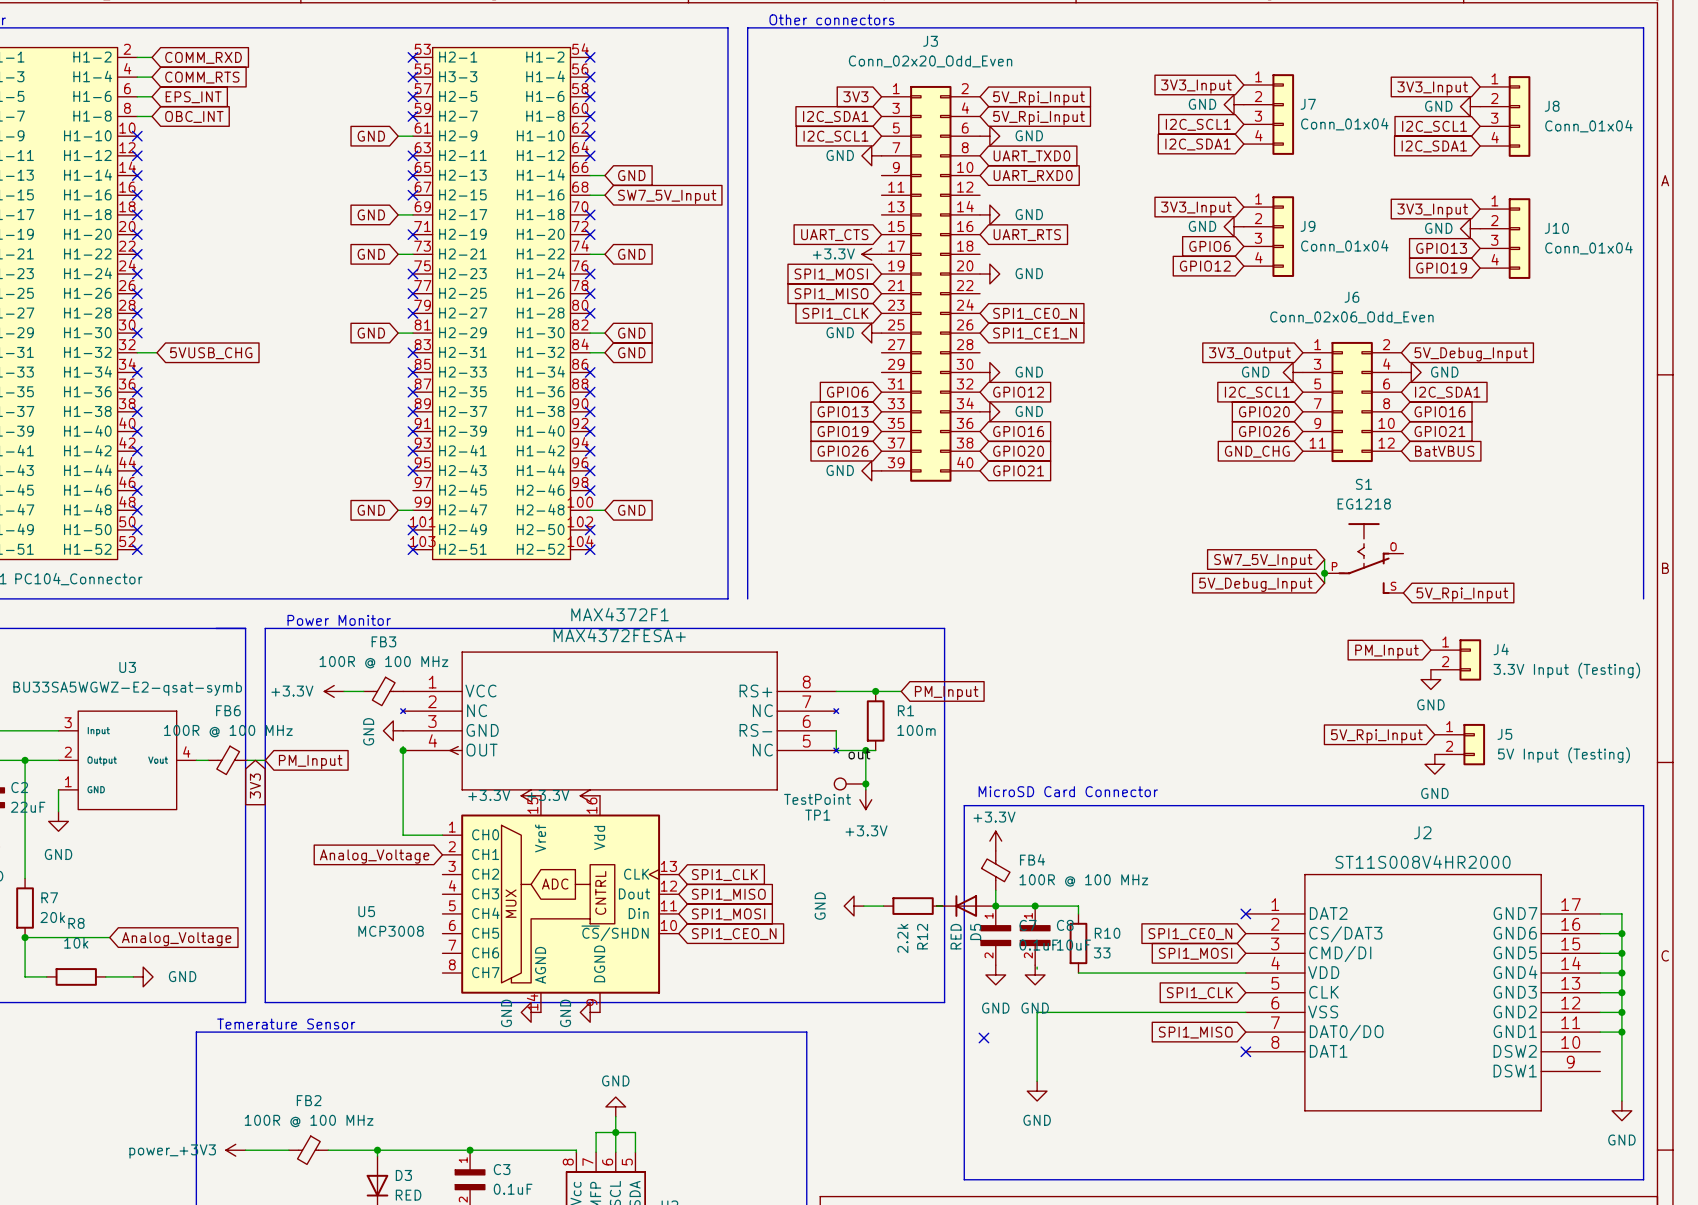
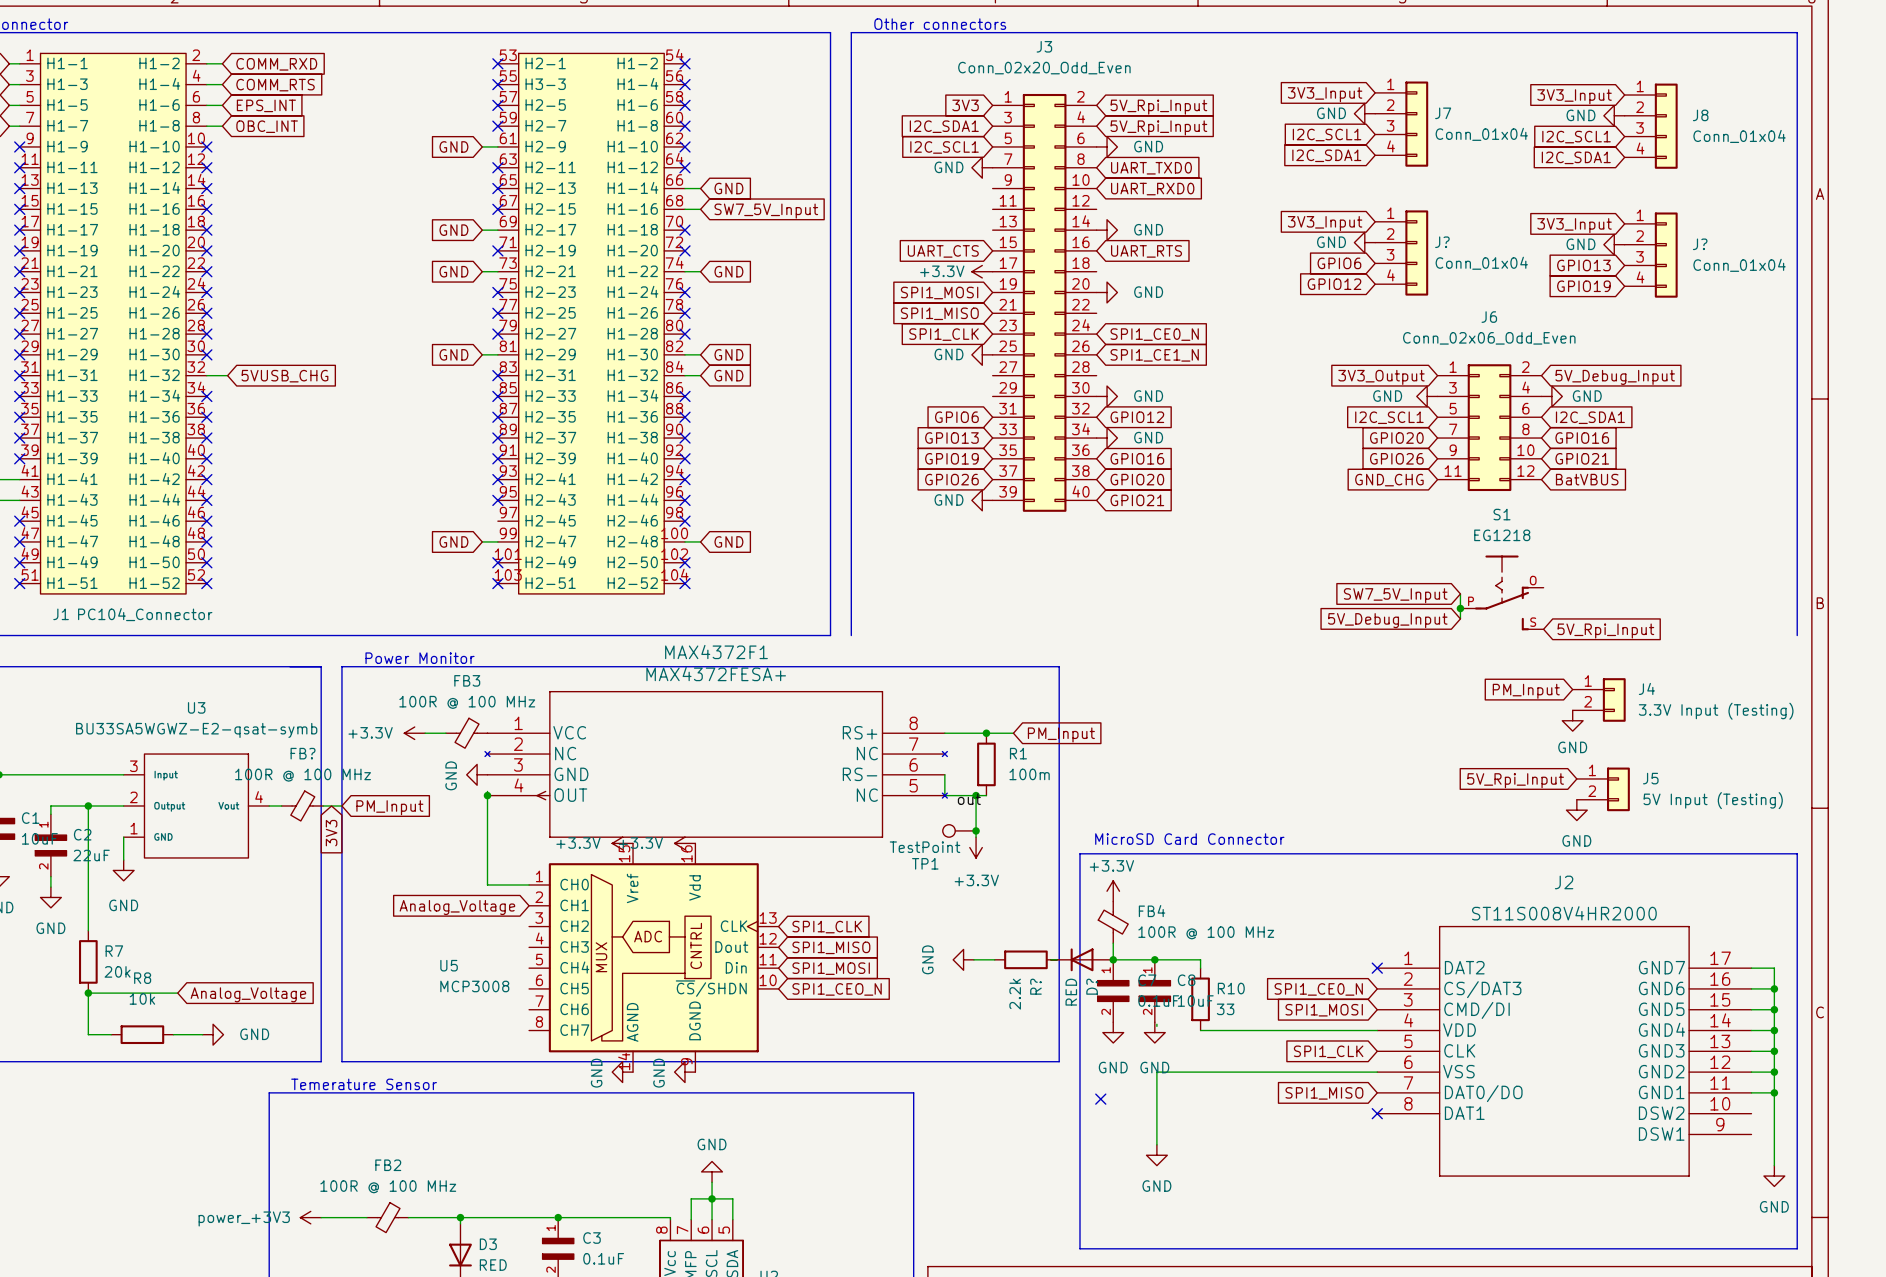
J9 name: J9 (1307, 226) -> J? (1442, 242)
J10 name: J10 (1556, 228) -> J? (1700, 244)
FB6 name: FB6 (228, 710) -> FB? (303, 753)
D5 name: D5 (975, 931) -> D? (1092, 986)
R12 name: R12 (922, 936) -> R? (1035, 986)

